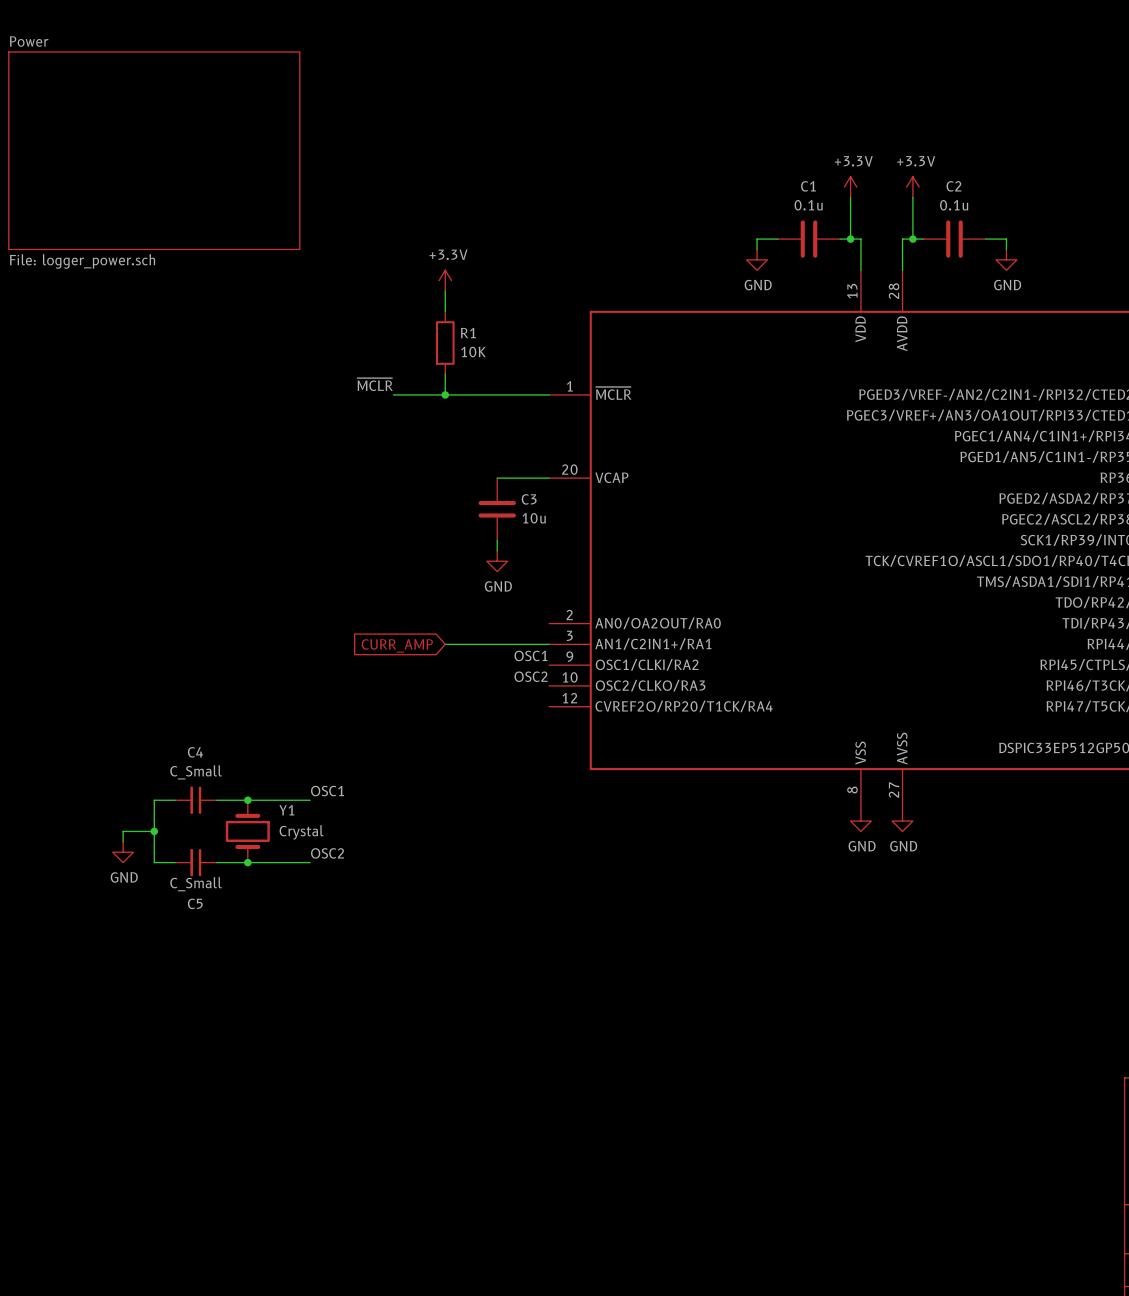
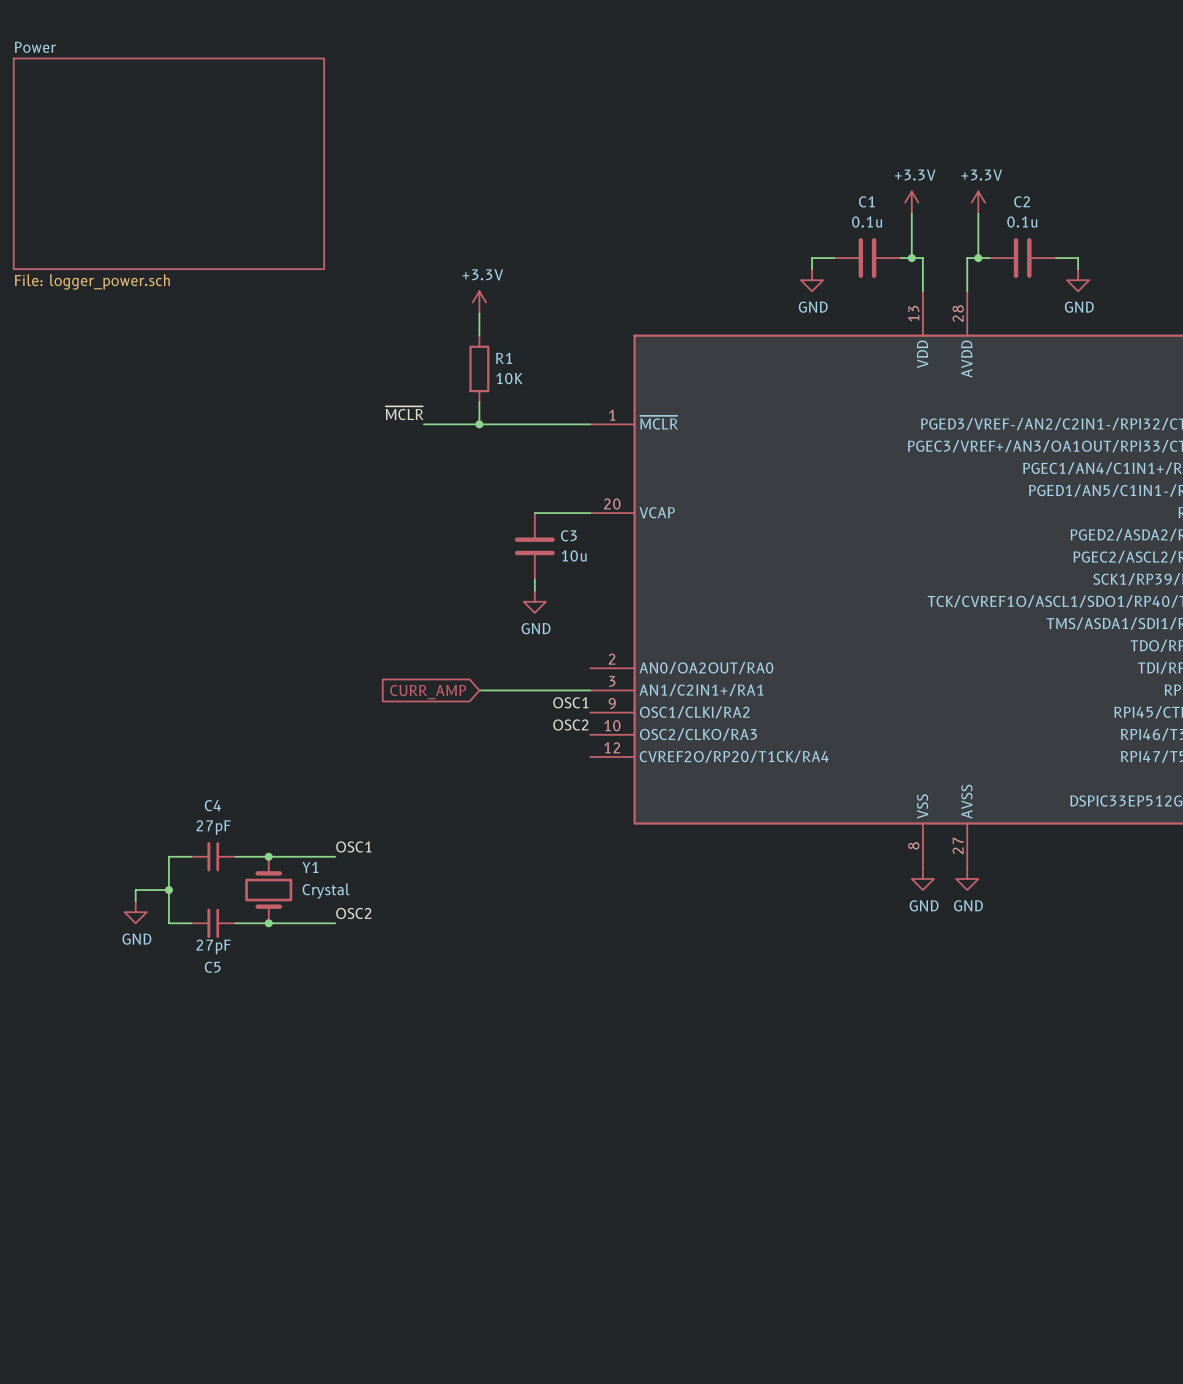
C4 value: C_Small (196, 772) -> 27pF (213, 827)
C5 value: C_Small (196, 884) -> 27pF (213, 946)

